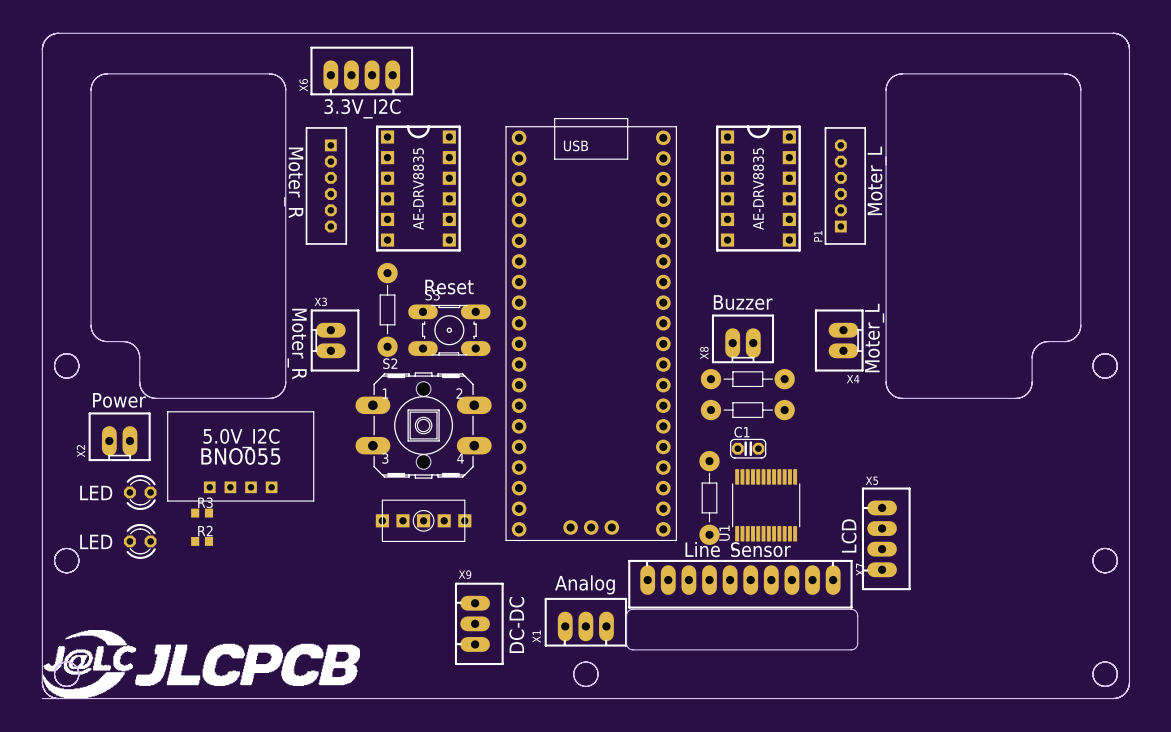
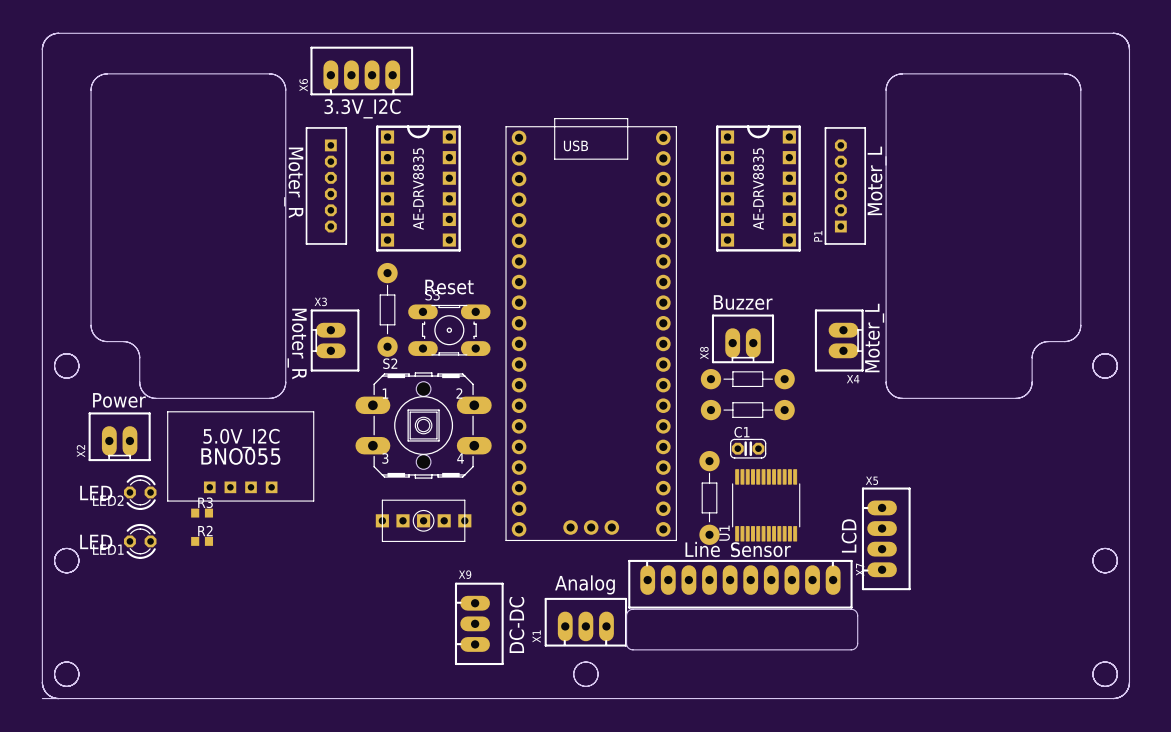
LED2 name: none -> LED2 (108, 500)
LED1 name: none -> LED1 (108, 549)
drawing: [41, 629, 360, 699] -> none

